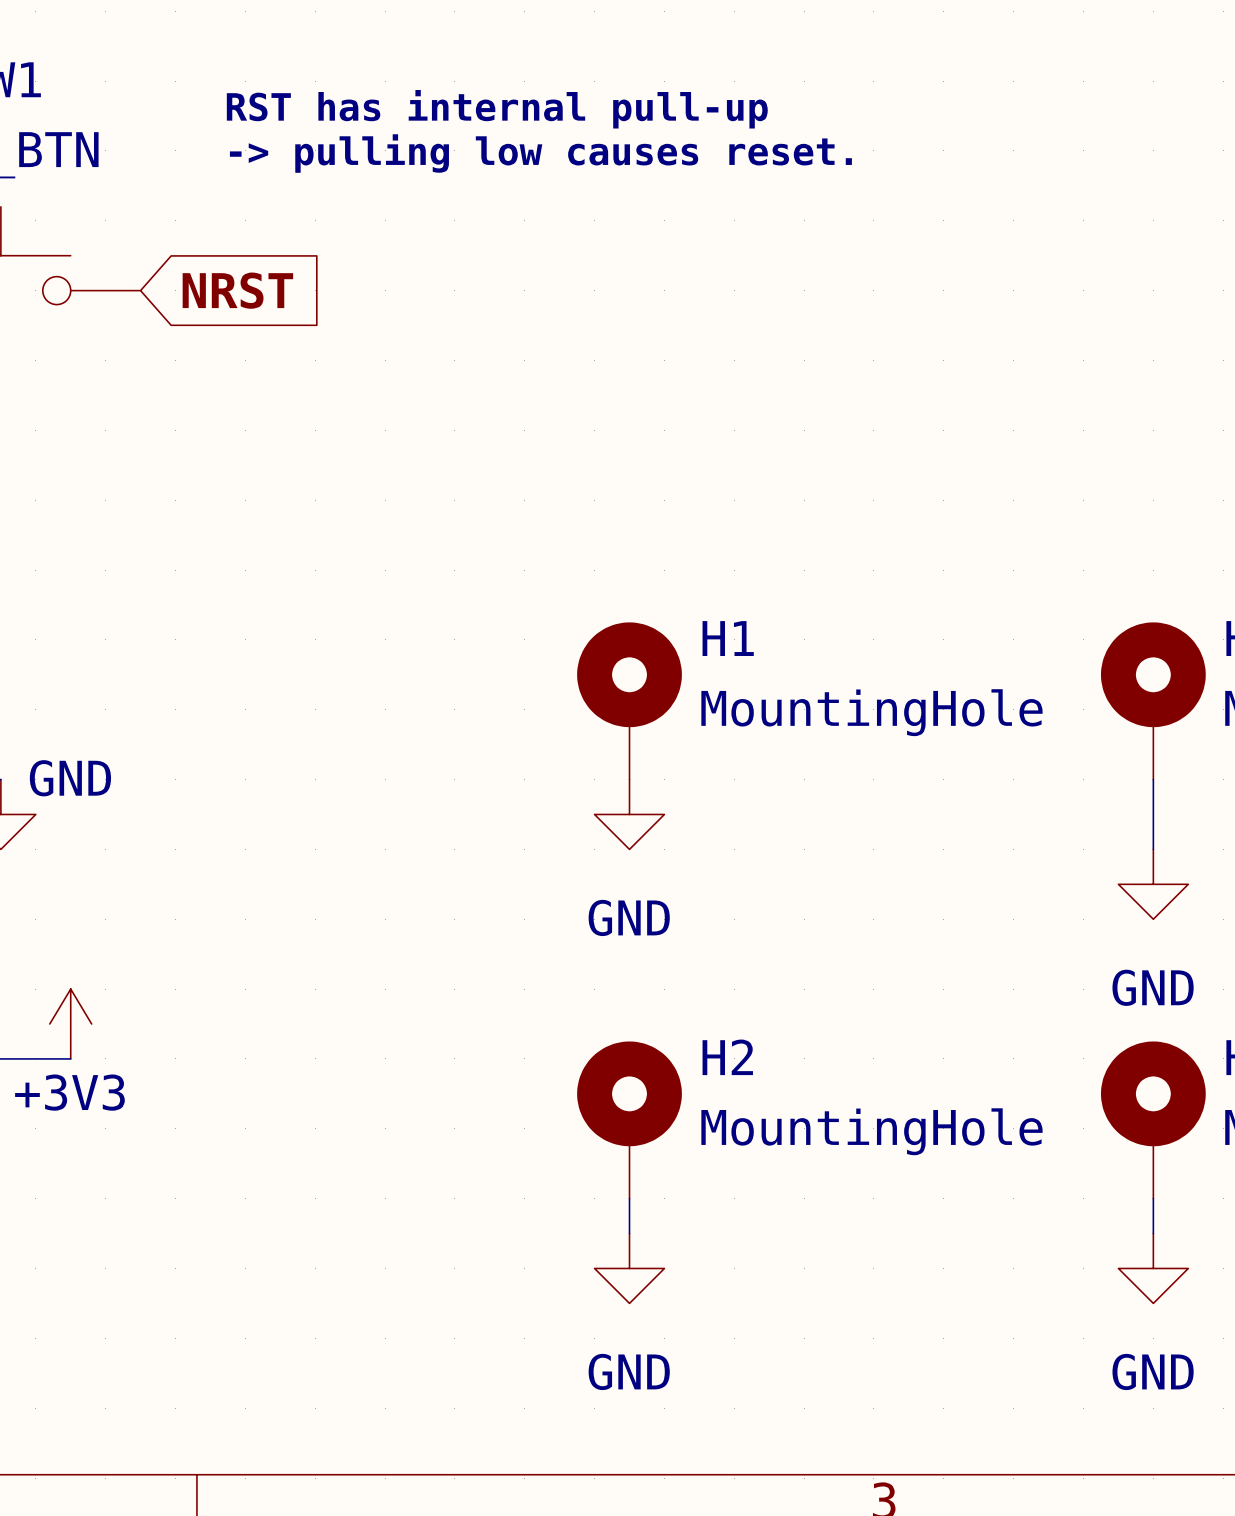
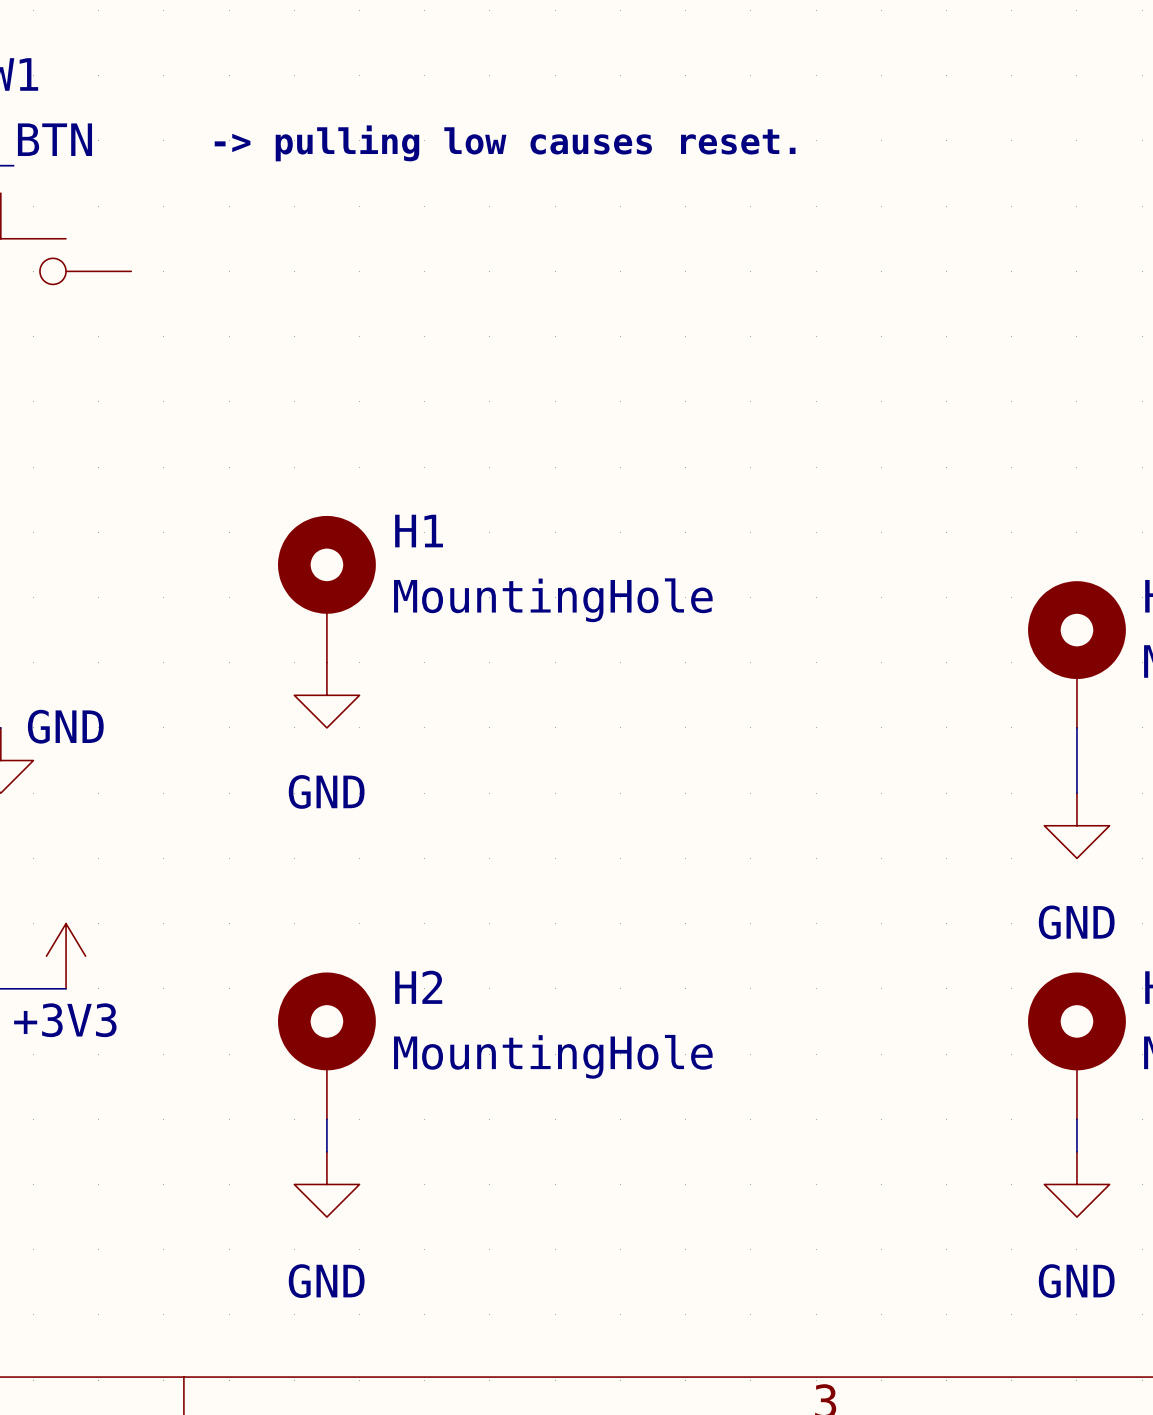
text: RST has internal pull-up (497, 109) -> none
global label: NRST (237, 290) -> none
H1 position: (629, 700) -> (326, 589)
power symbol: none -> GND (326, 695)
power symbol: GND (629, 814) -> none
H2 position: (629, 1120) -> (326, 1045)
wire: (629, 1198) (629, 1233) -> (326, 1119) (326, 1151)
power symbol: none -> GND (326, 1184)
power symbol: GND (629, 1268) -> none

